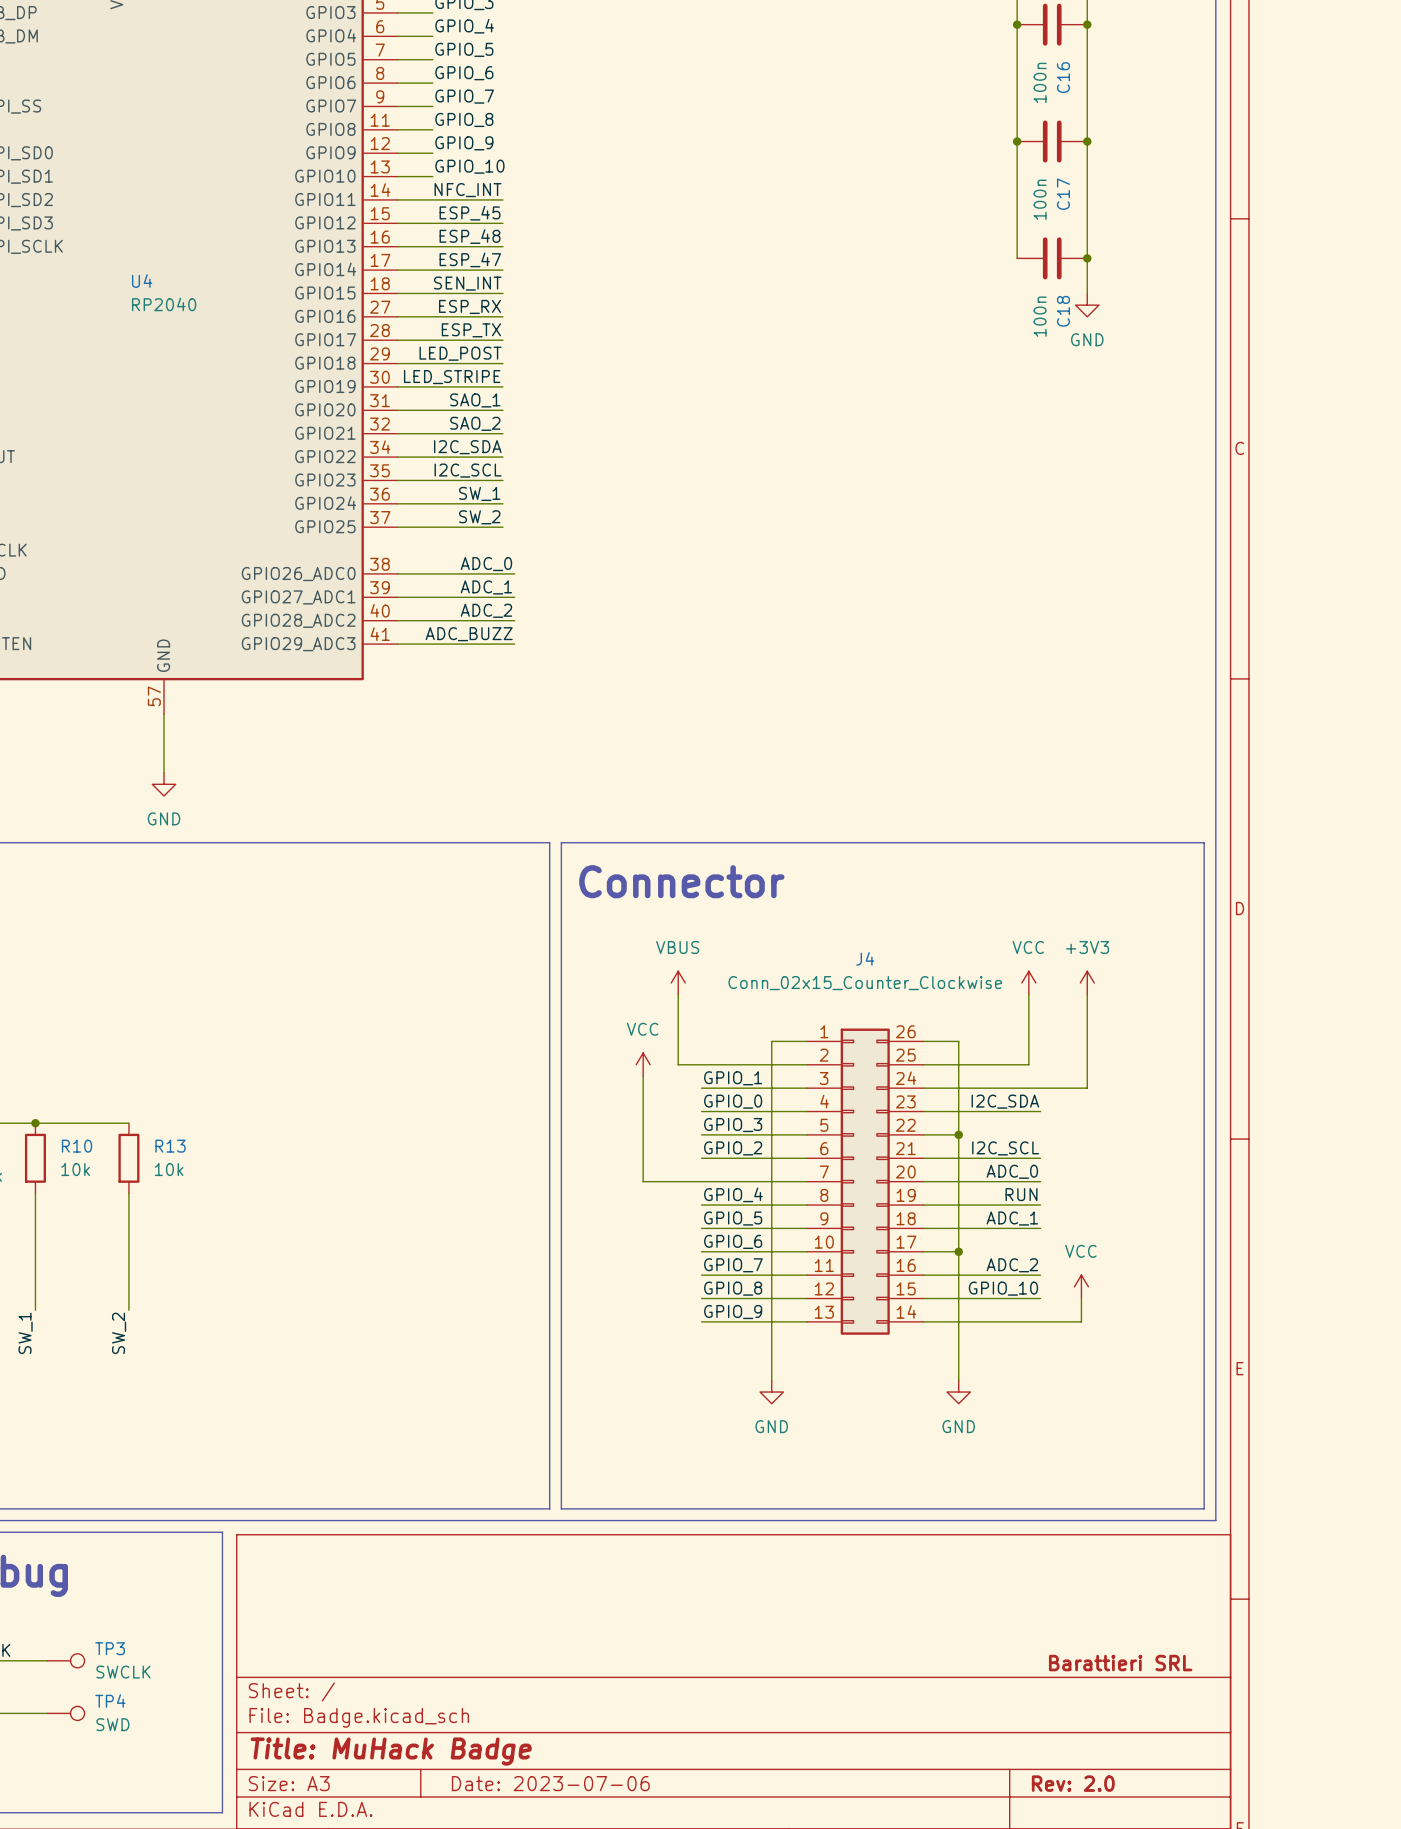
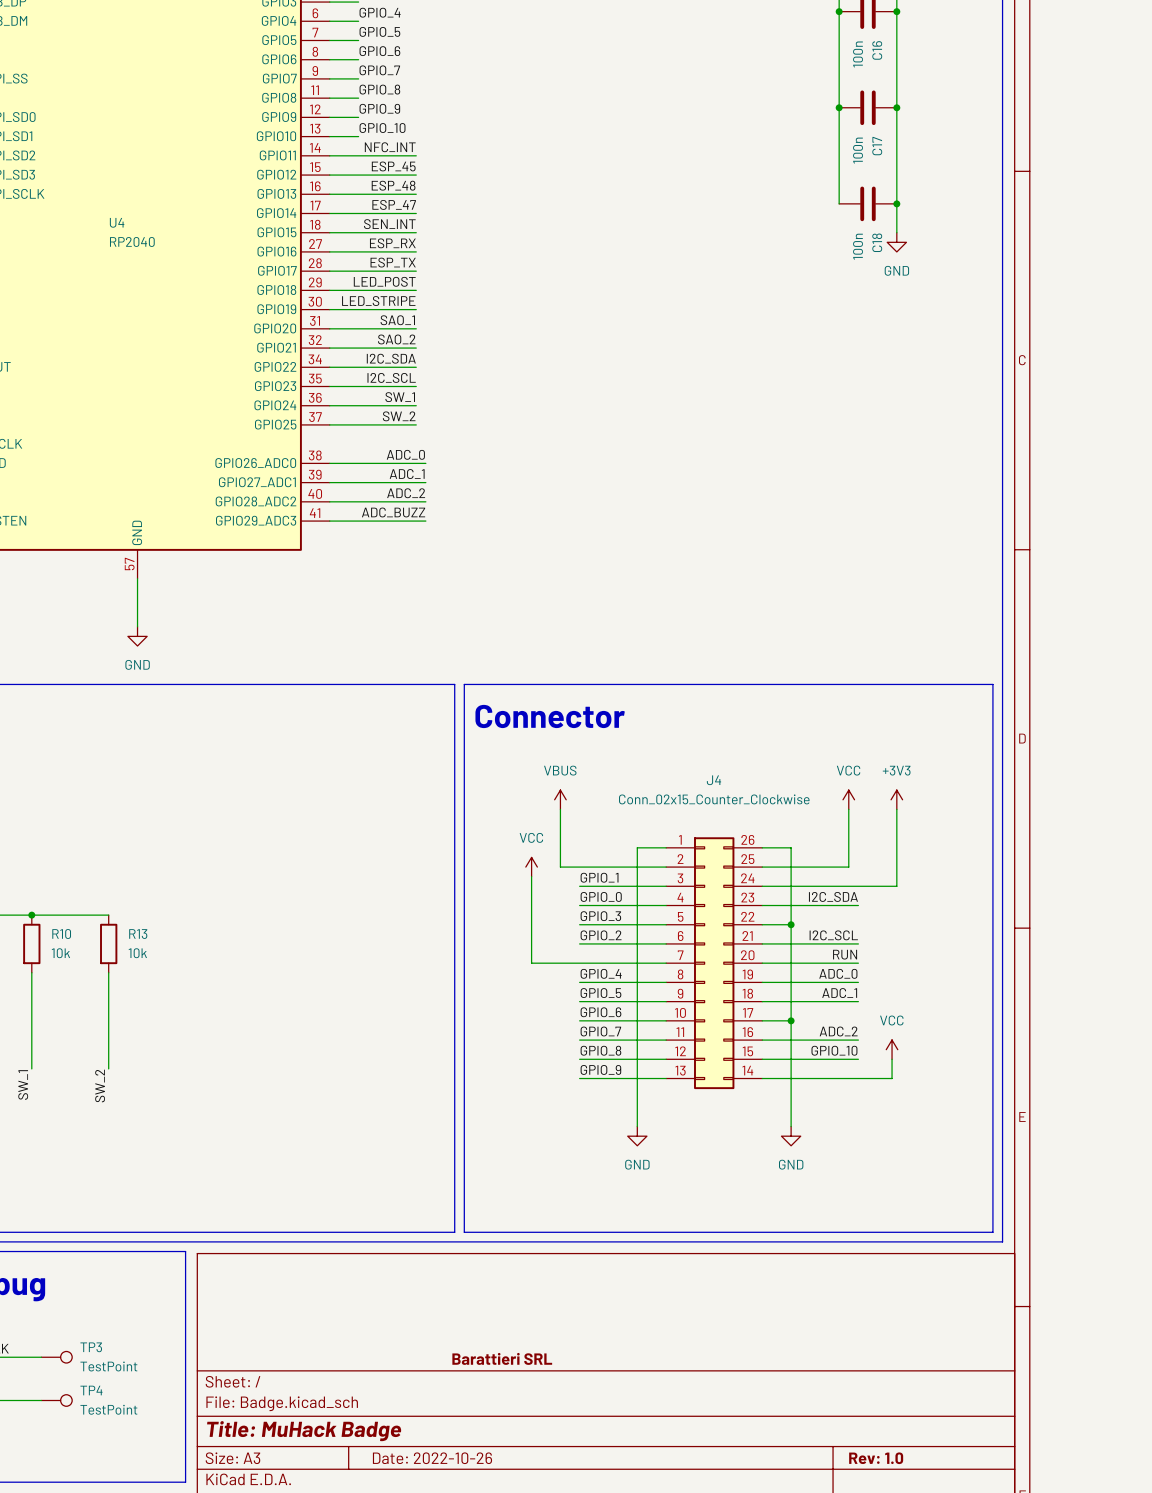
label: ADC_0 (1012, 1171) -> RUN (845, 954)
label: RUN (1021, 1194) -> ADC_0 (838, 973)
TP3 value: SWCLK (123, 1672) -> TestPoint (108, 1366)
TP4 value: SWD (112, 1724) -> TestPoint (108, 1409)
title block: Date: 2023-07-06 (550, 1783) -> Date: 2022-10-26 (432, 1458)
title block: Rev: 2.0 (1073, 1783) -> Rev: 1.0 (876, 1458)

